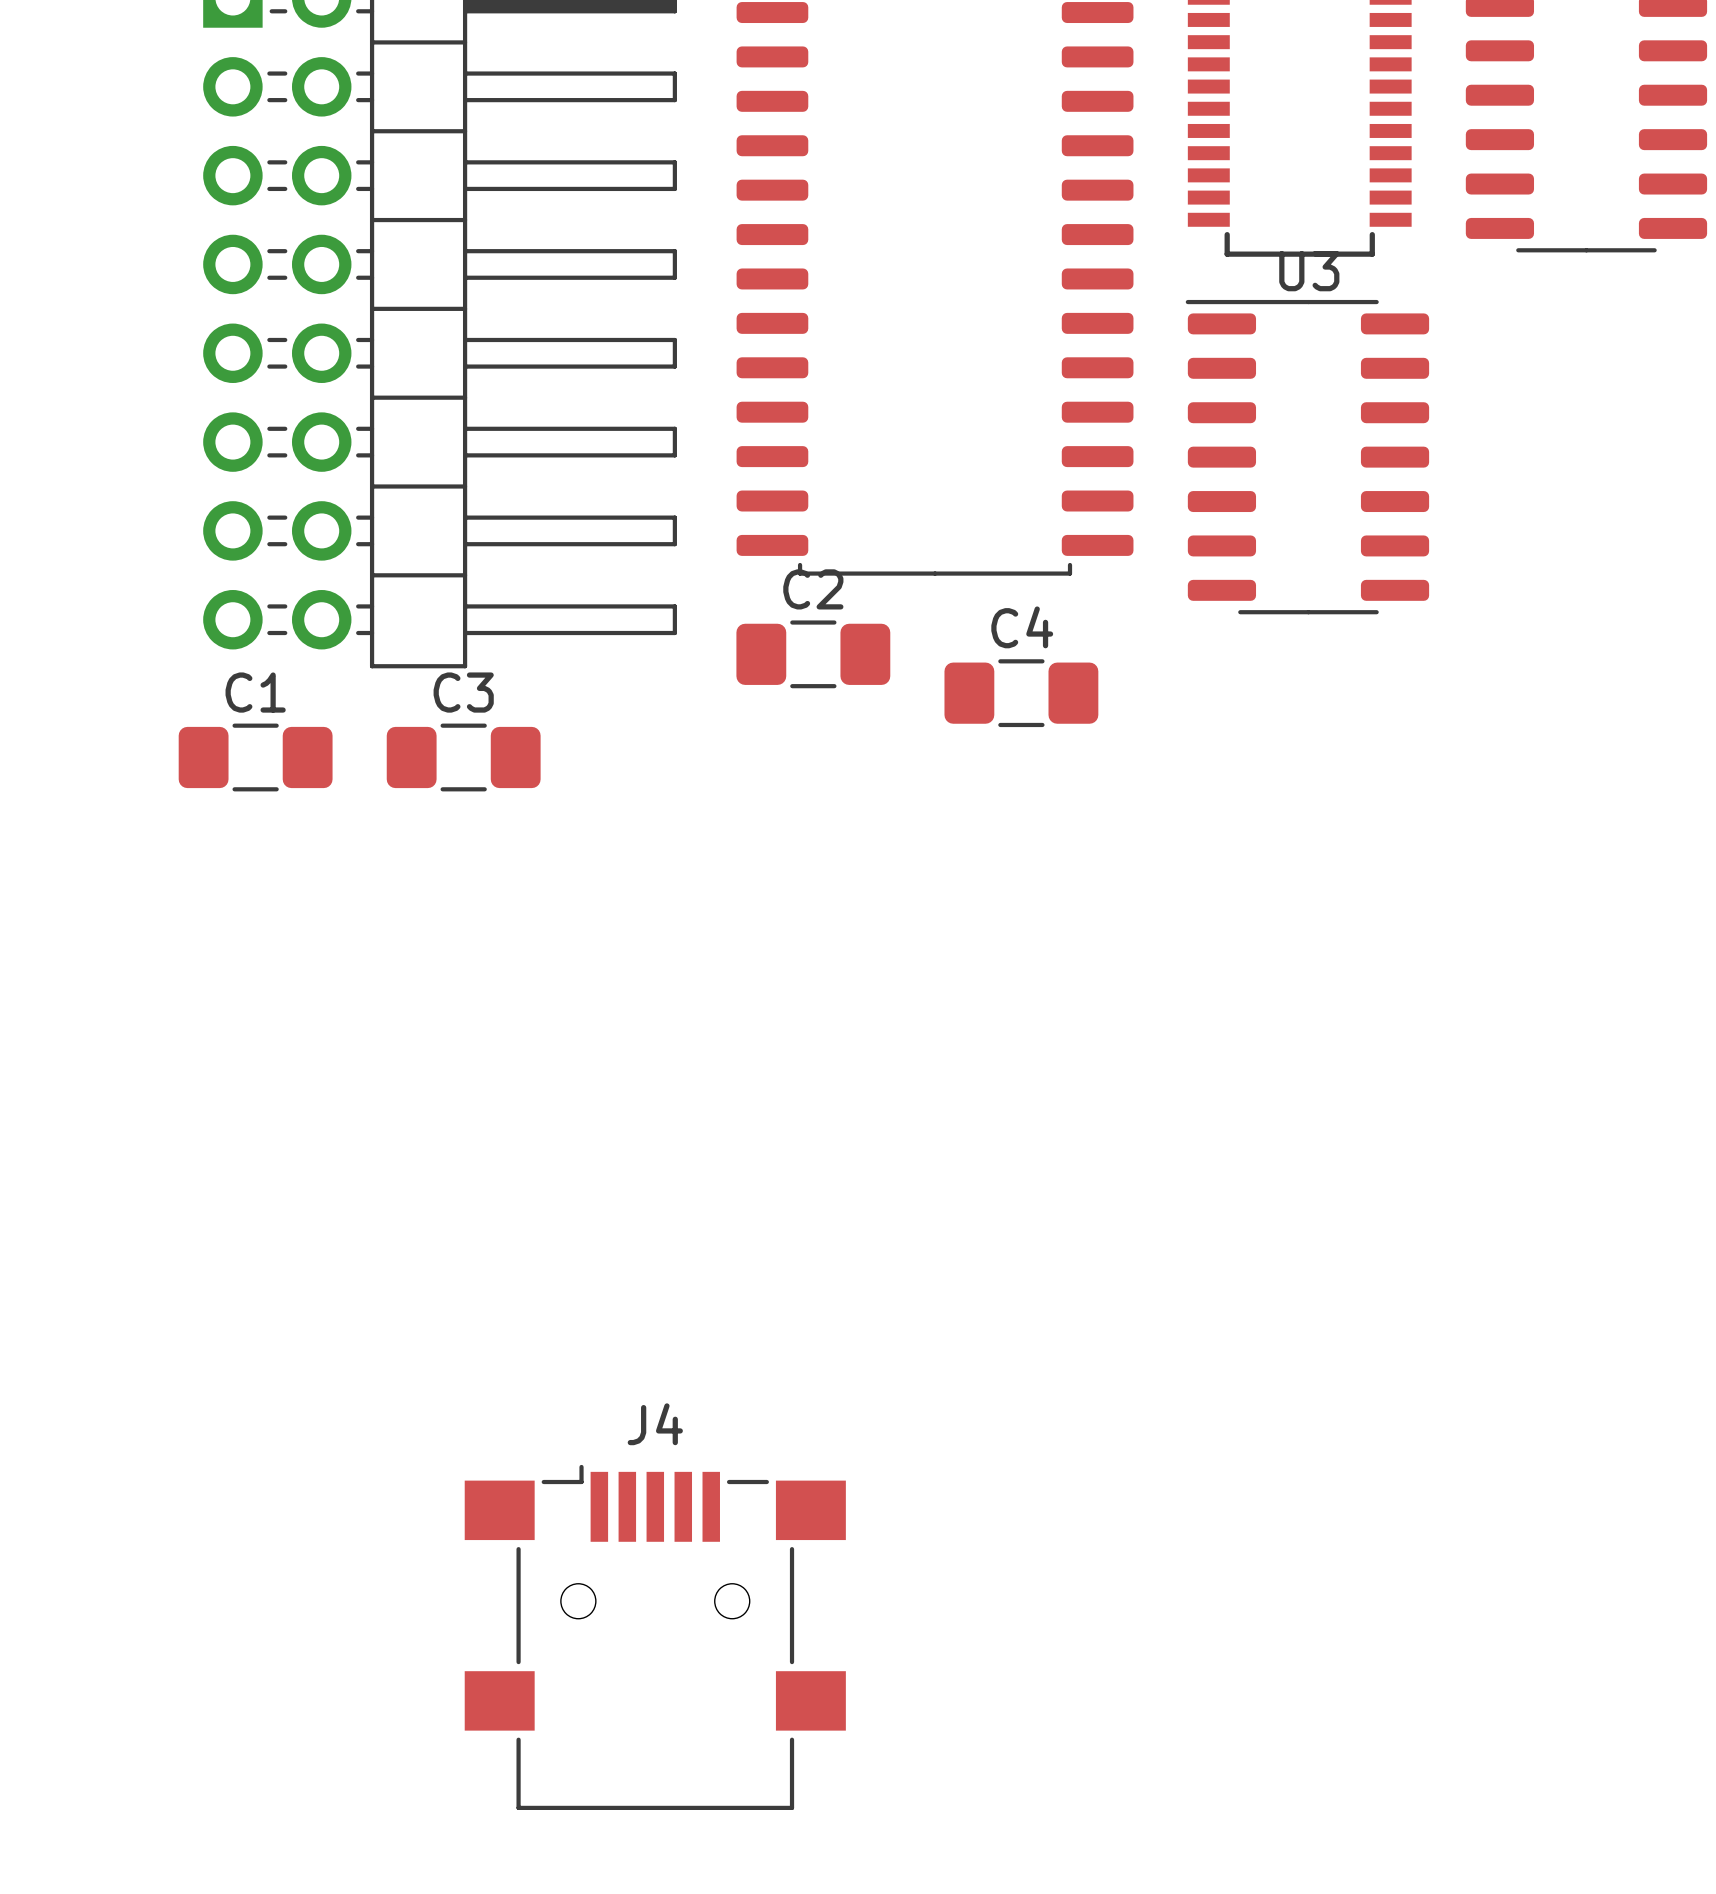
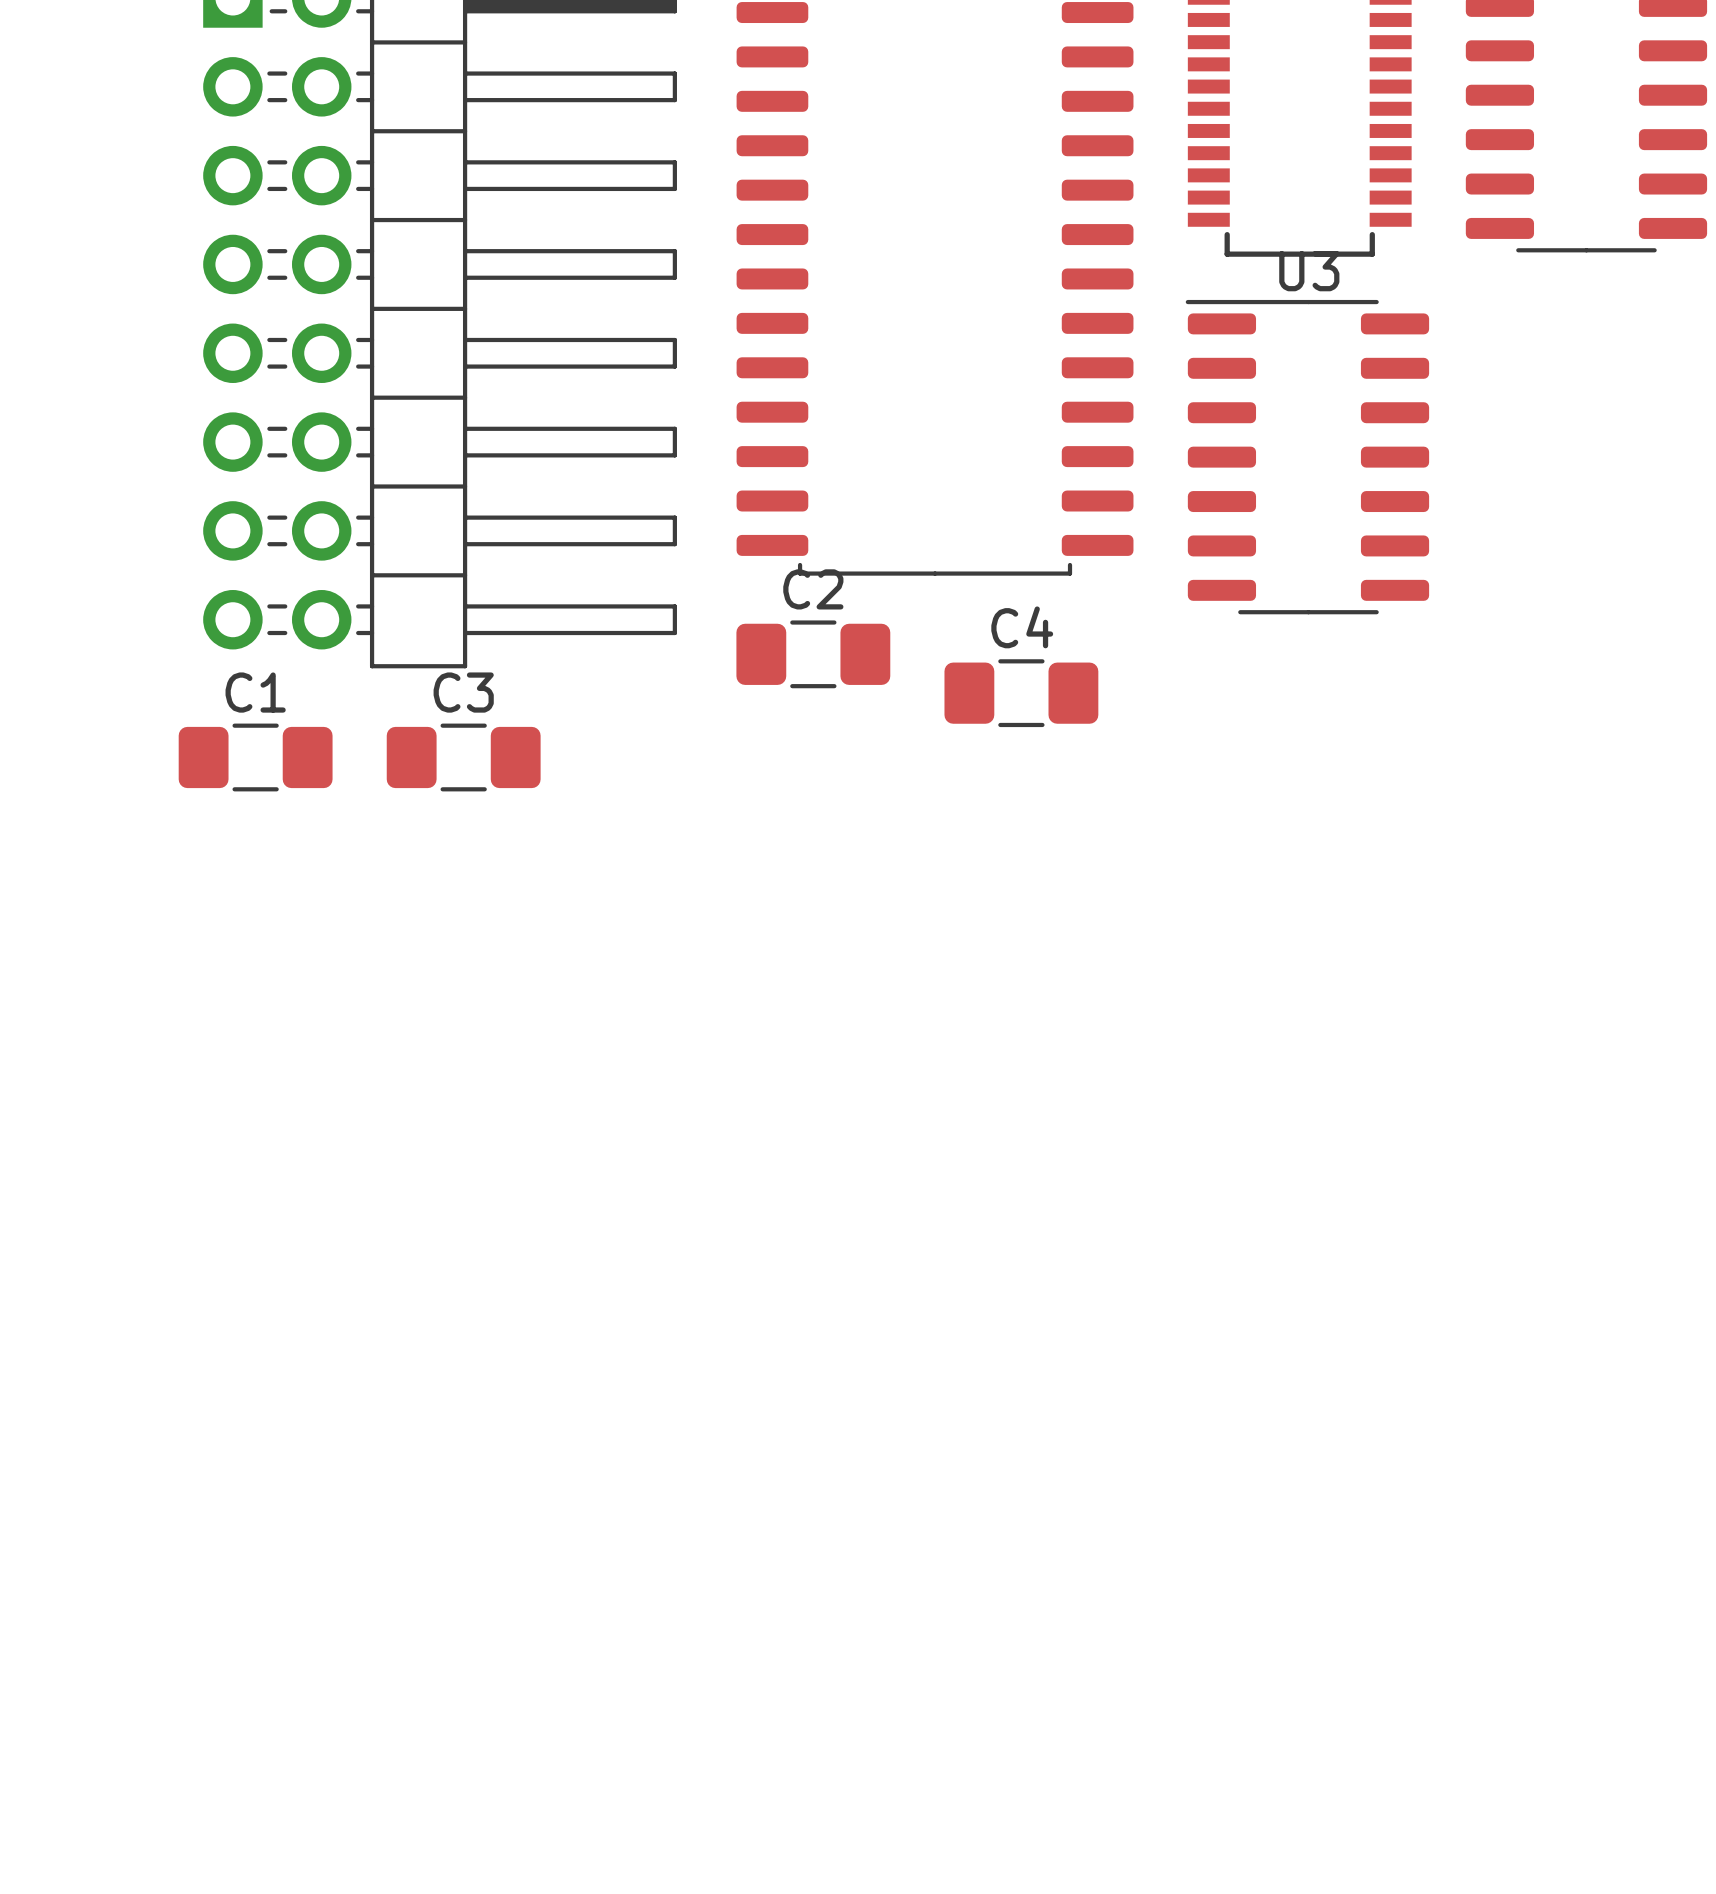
J4: (655, 1637) -> none

